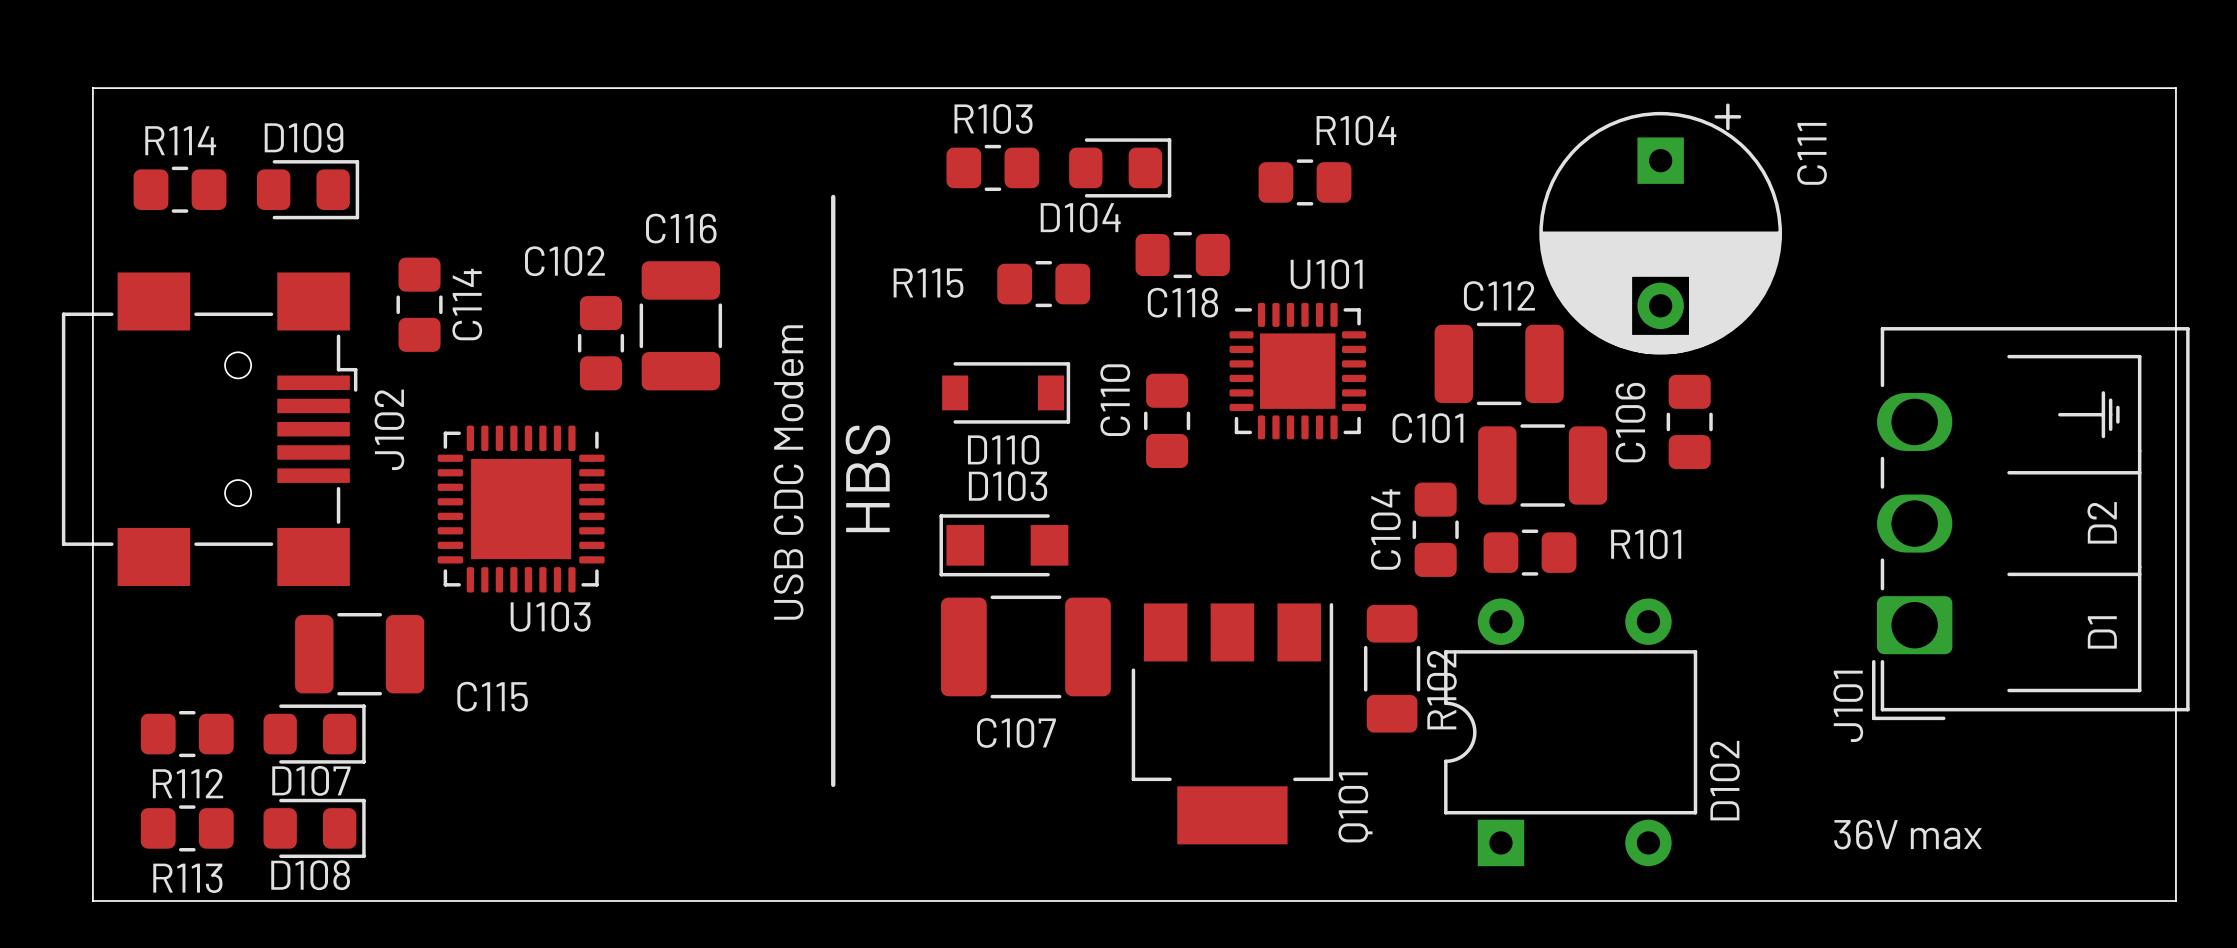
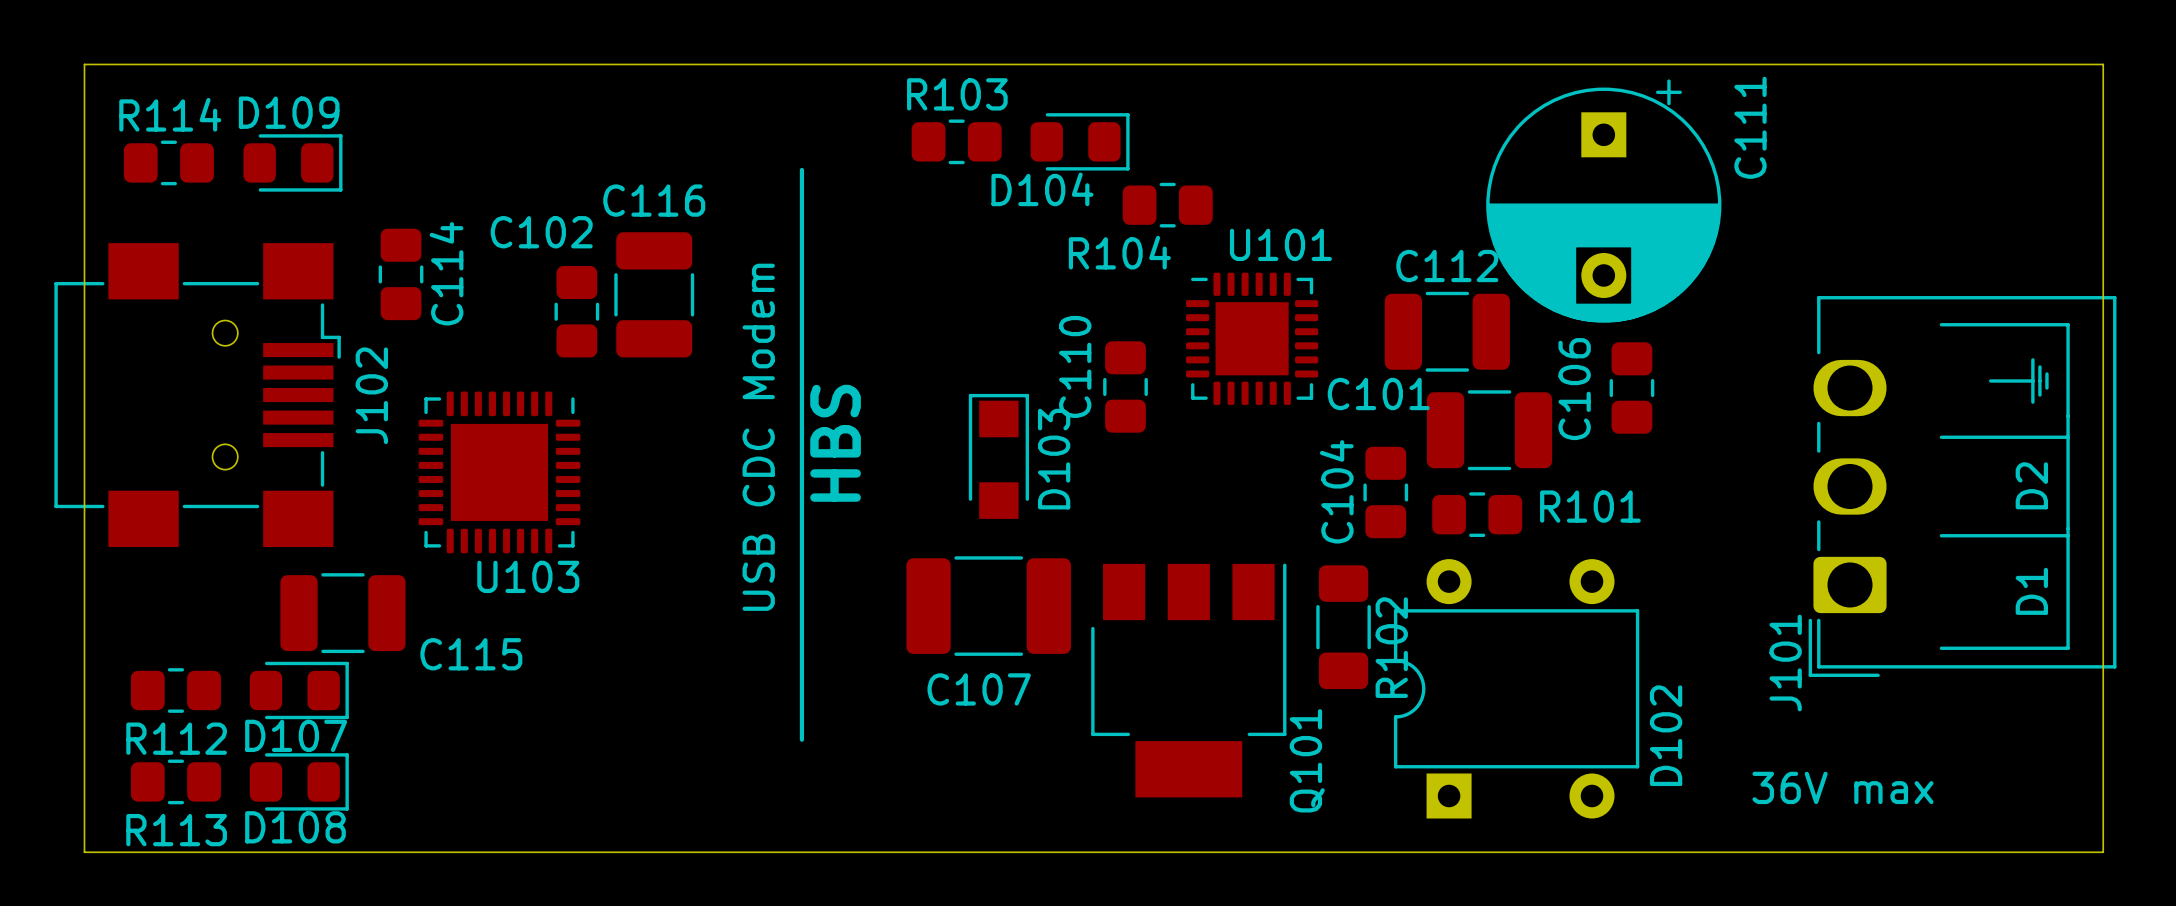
R104 name position: R104 (1356, 130) -> R104 (1119, 252)
R104 position: (1305, 182) -> (1167, 205)
C118: (1182, 255) -> none
R115: (1043, 284) -> none
D110: (1006, 392) -> none
D103 rotation: 0° (1003, 545) -> 90° clockwise (998, 456)

